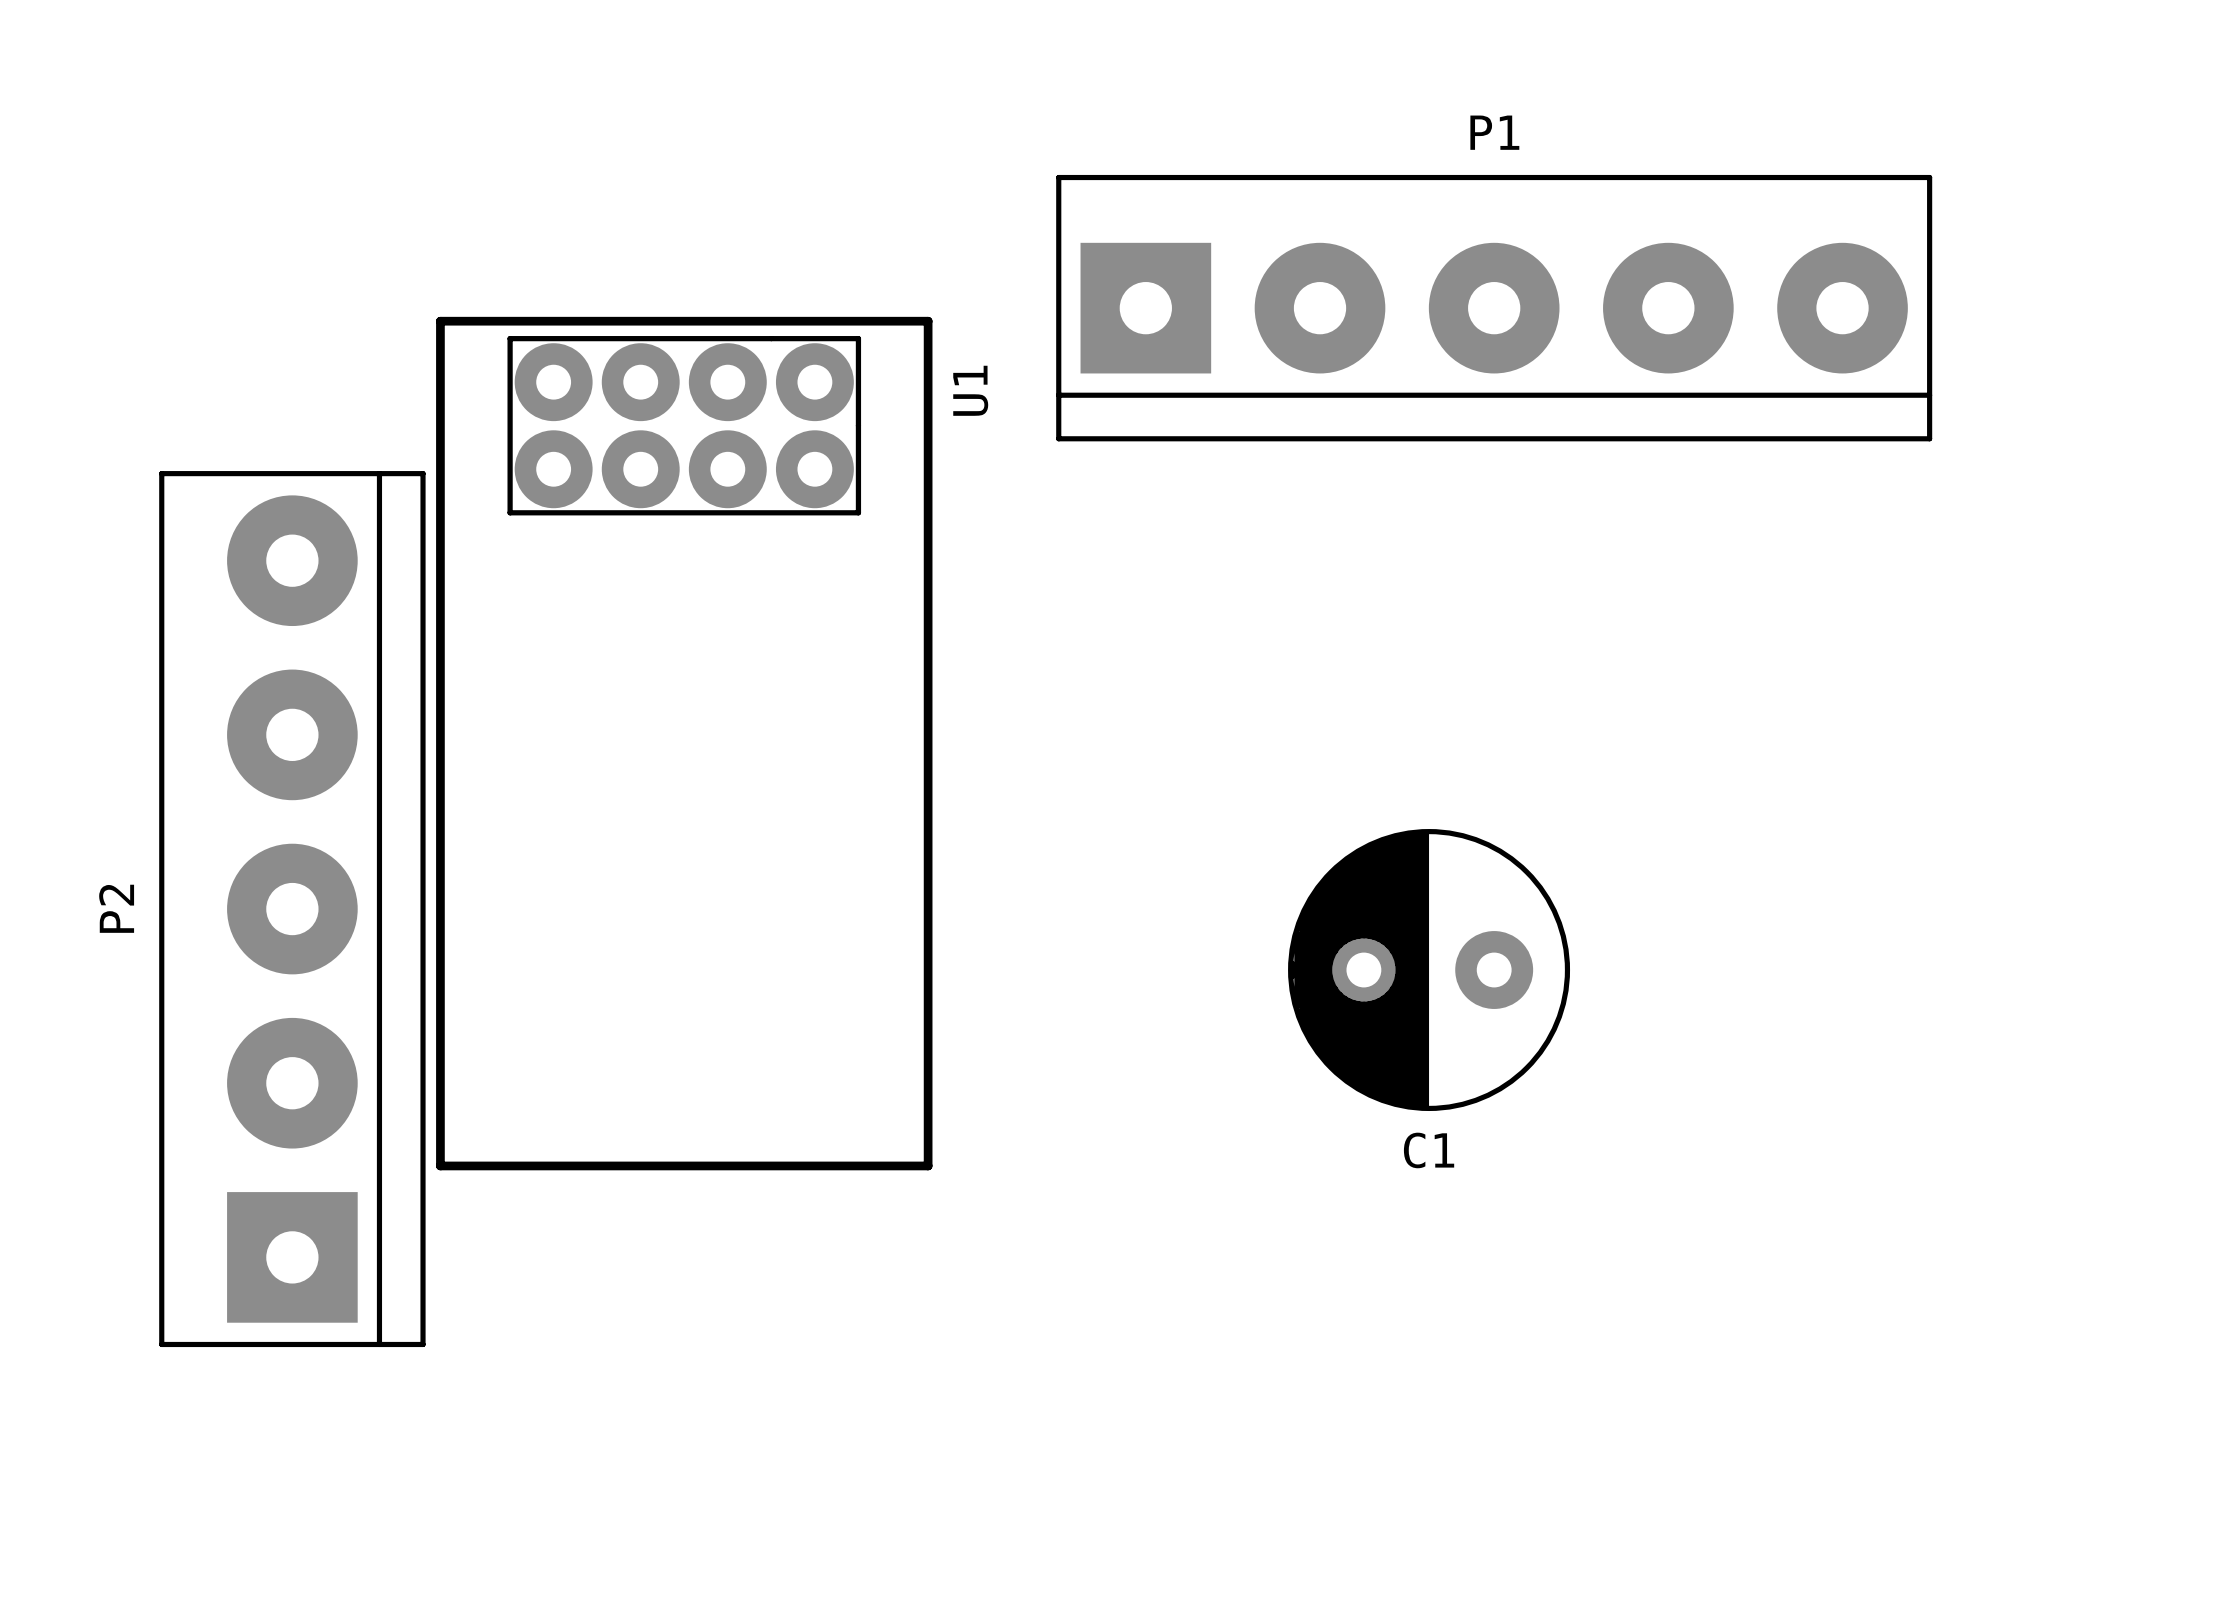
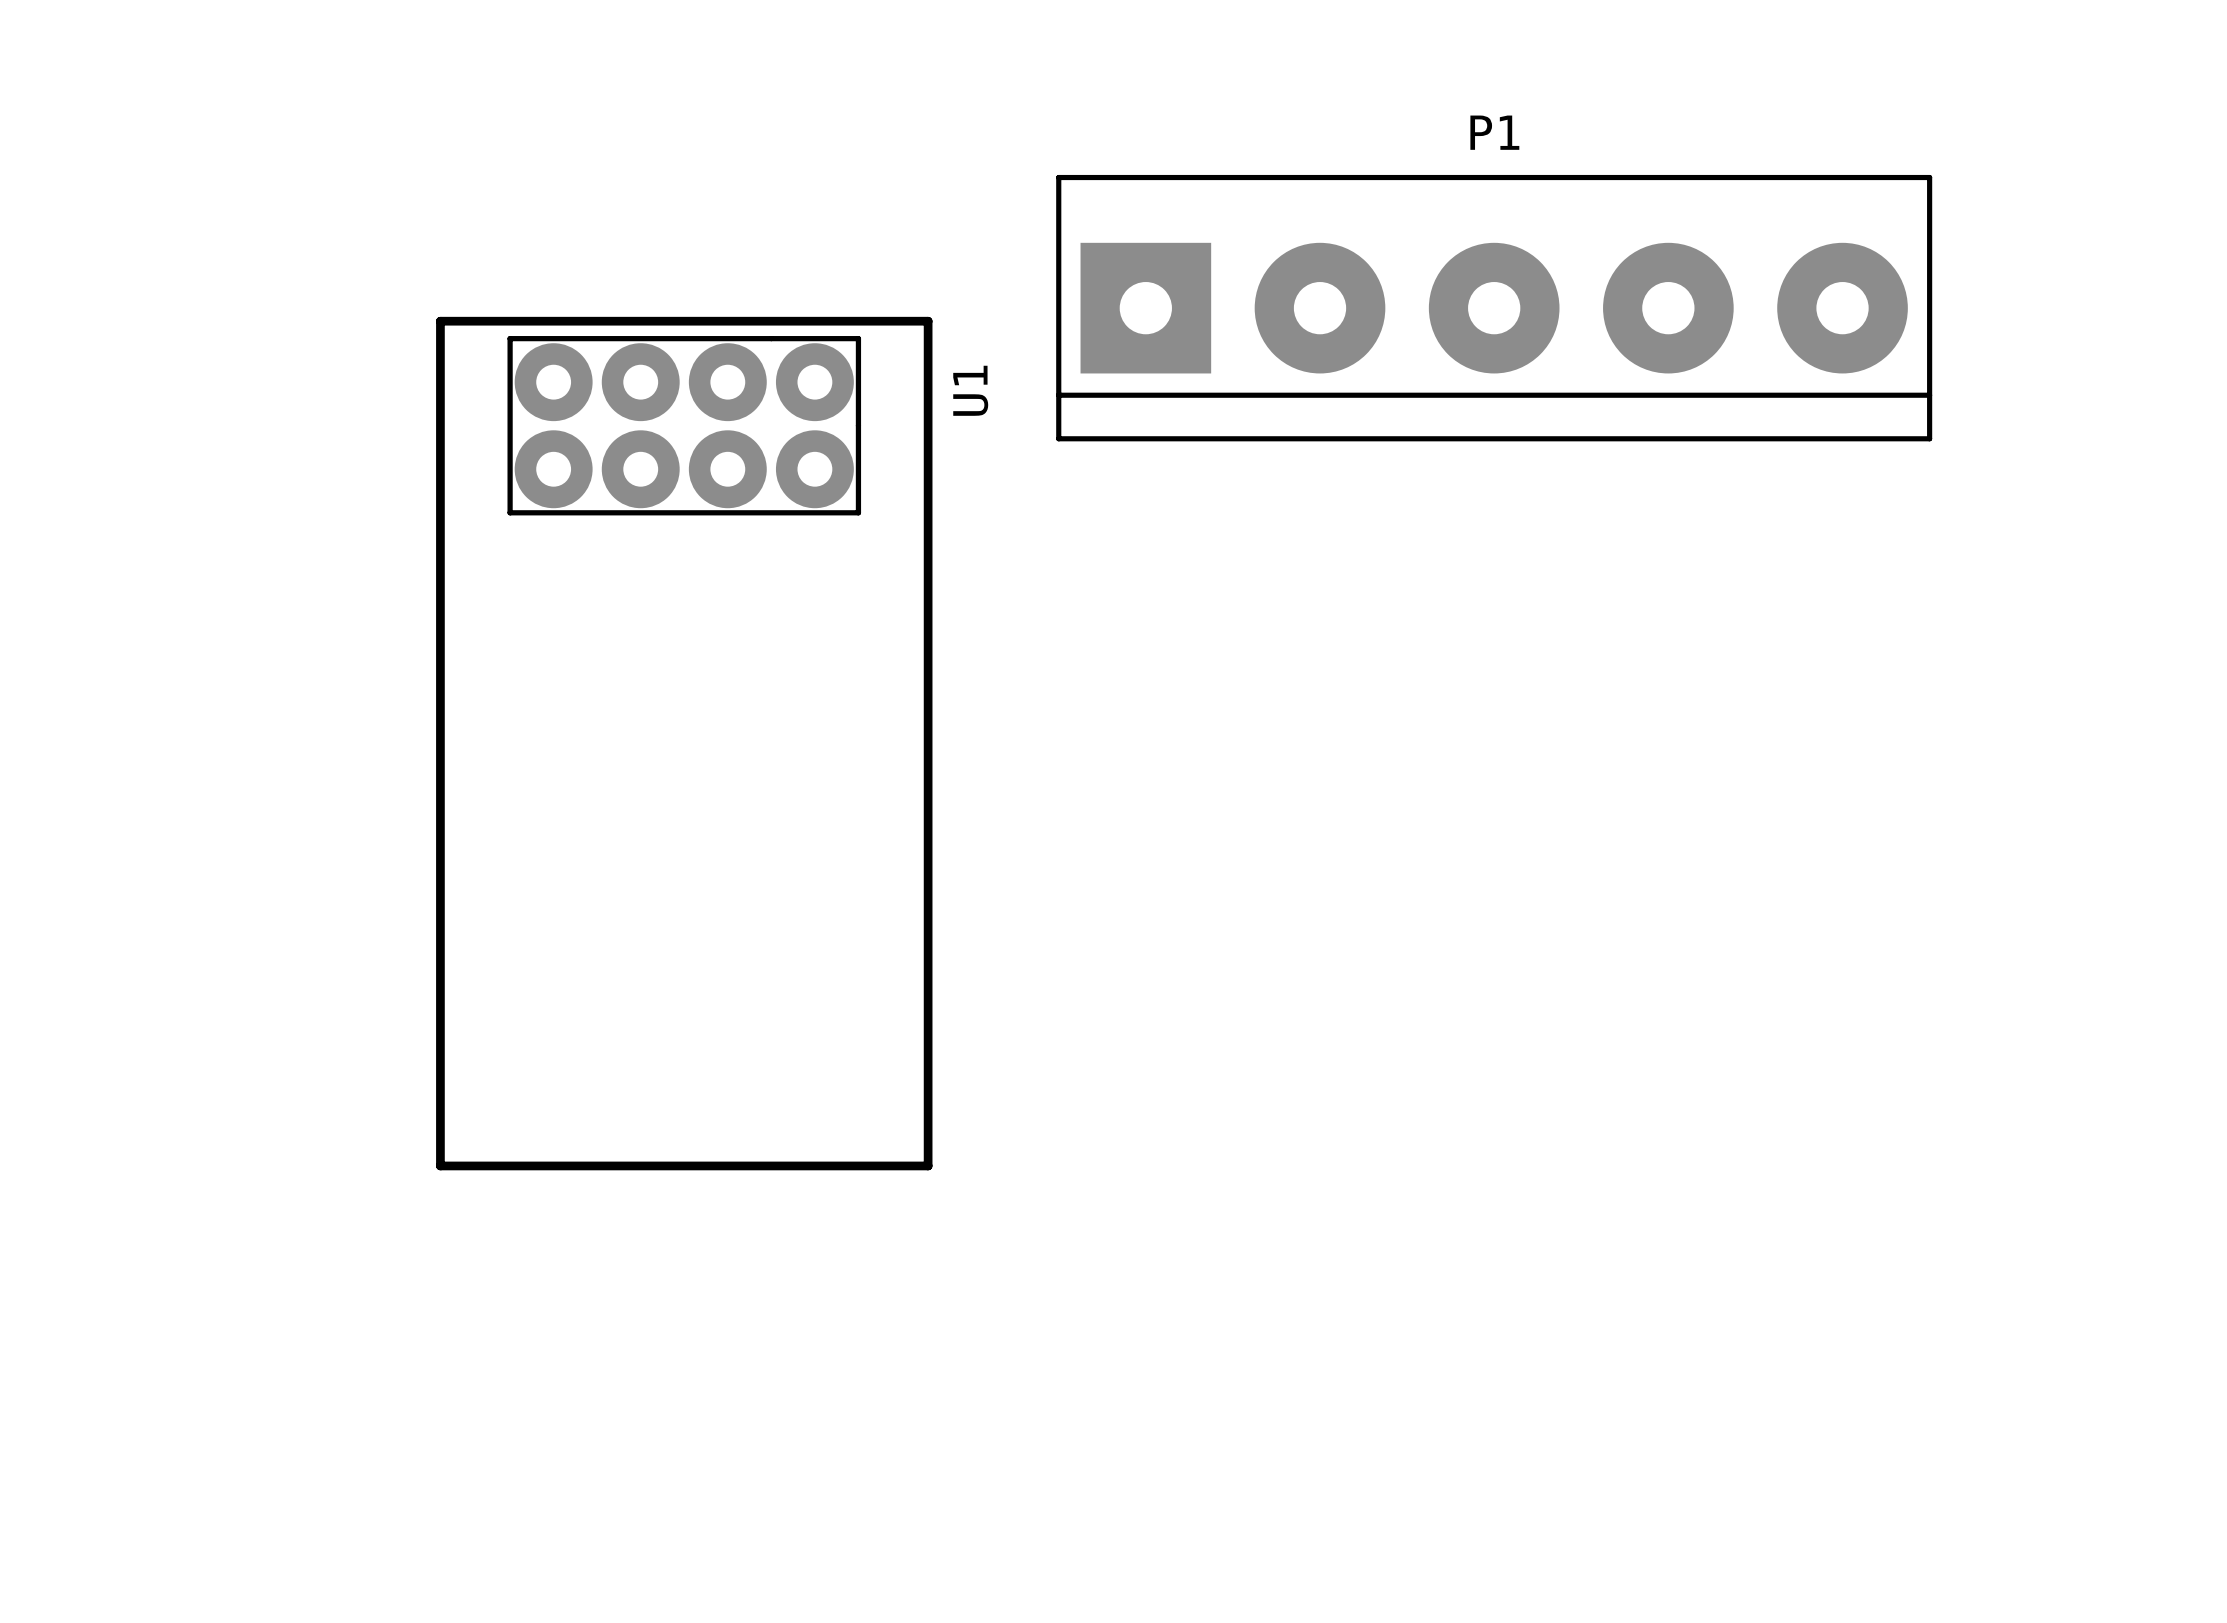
P2: (292, 909) -> none
C1: (1429, 970) -> none

